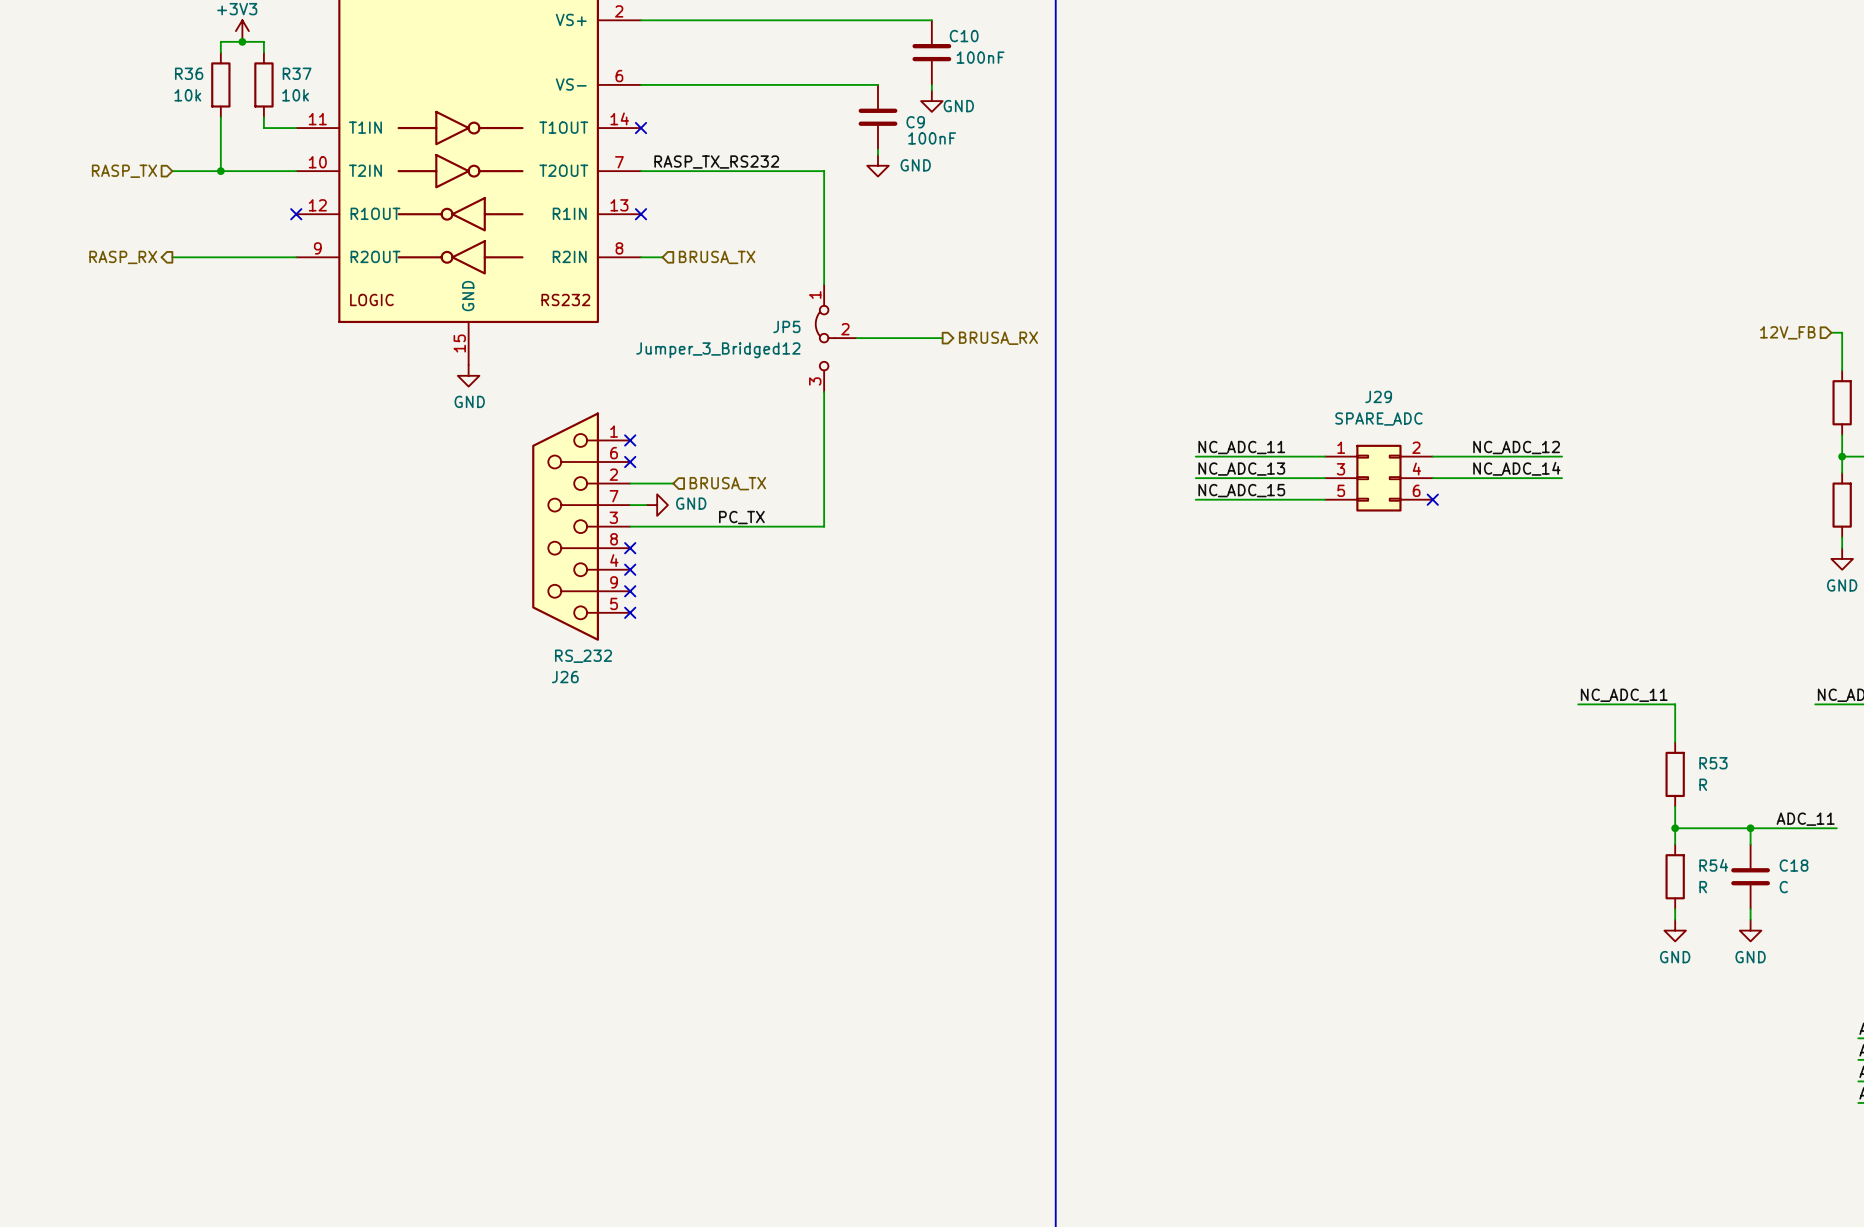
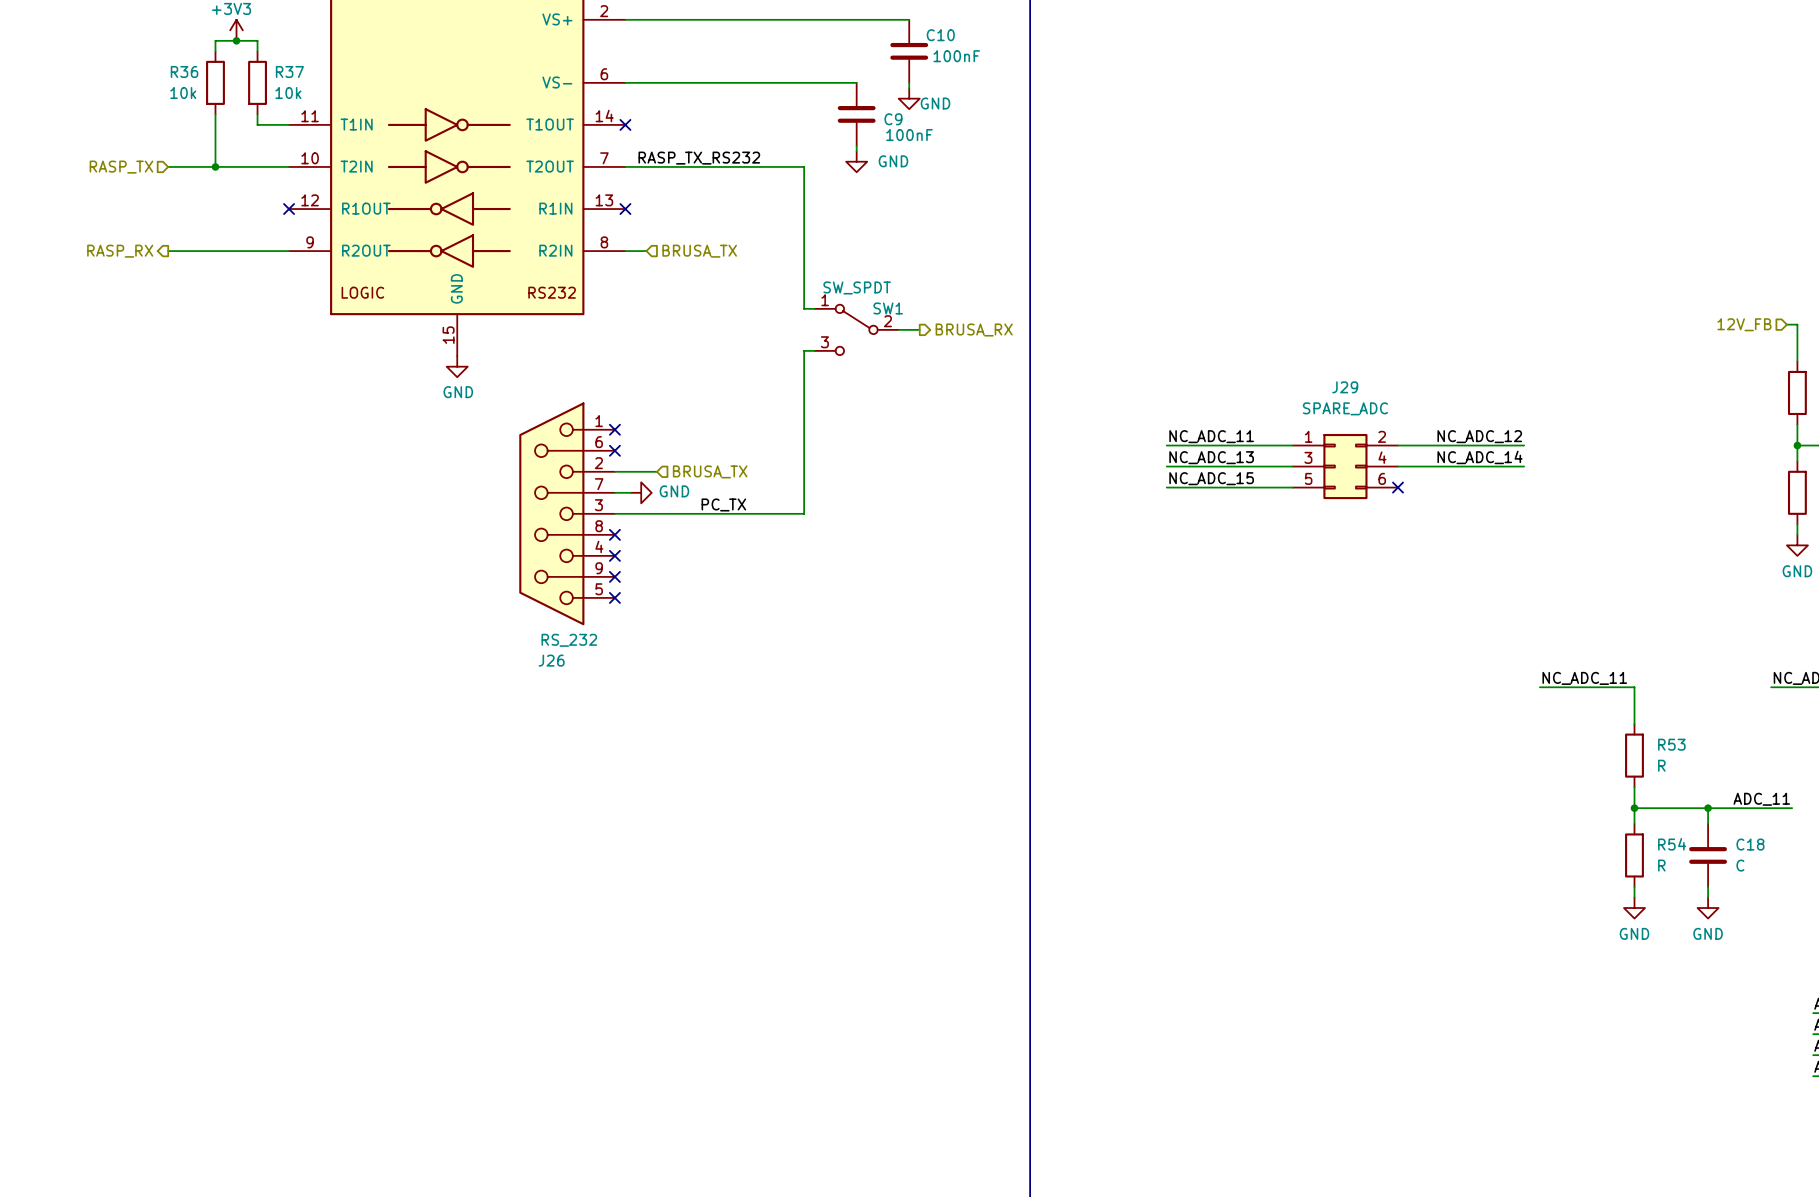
JP5: Jumper_3_Bridged12 (836, 338) -> none
wire: (856, 338) (921, 338) -> none
SW1: none -> SW_SPDT (856, 329)

